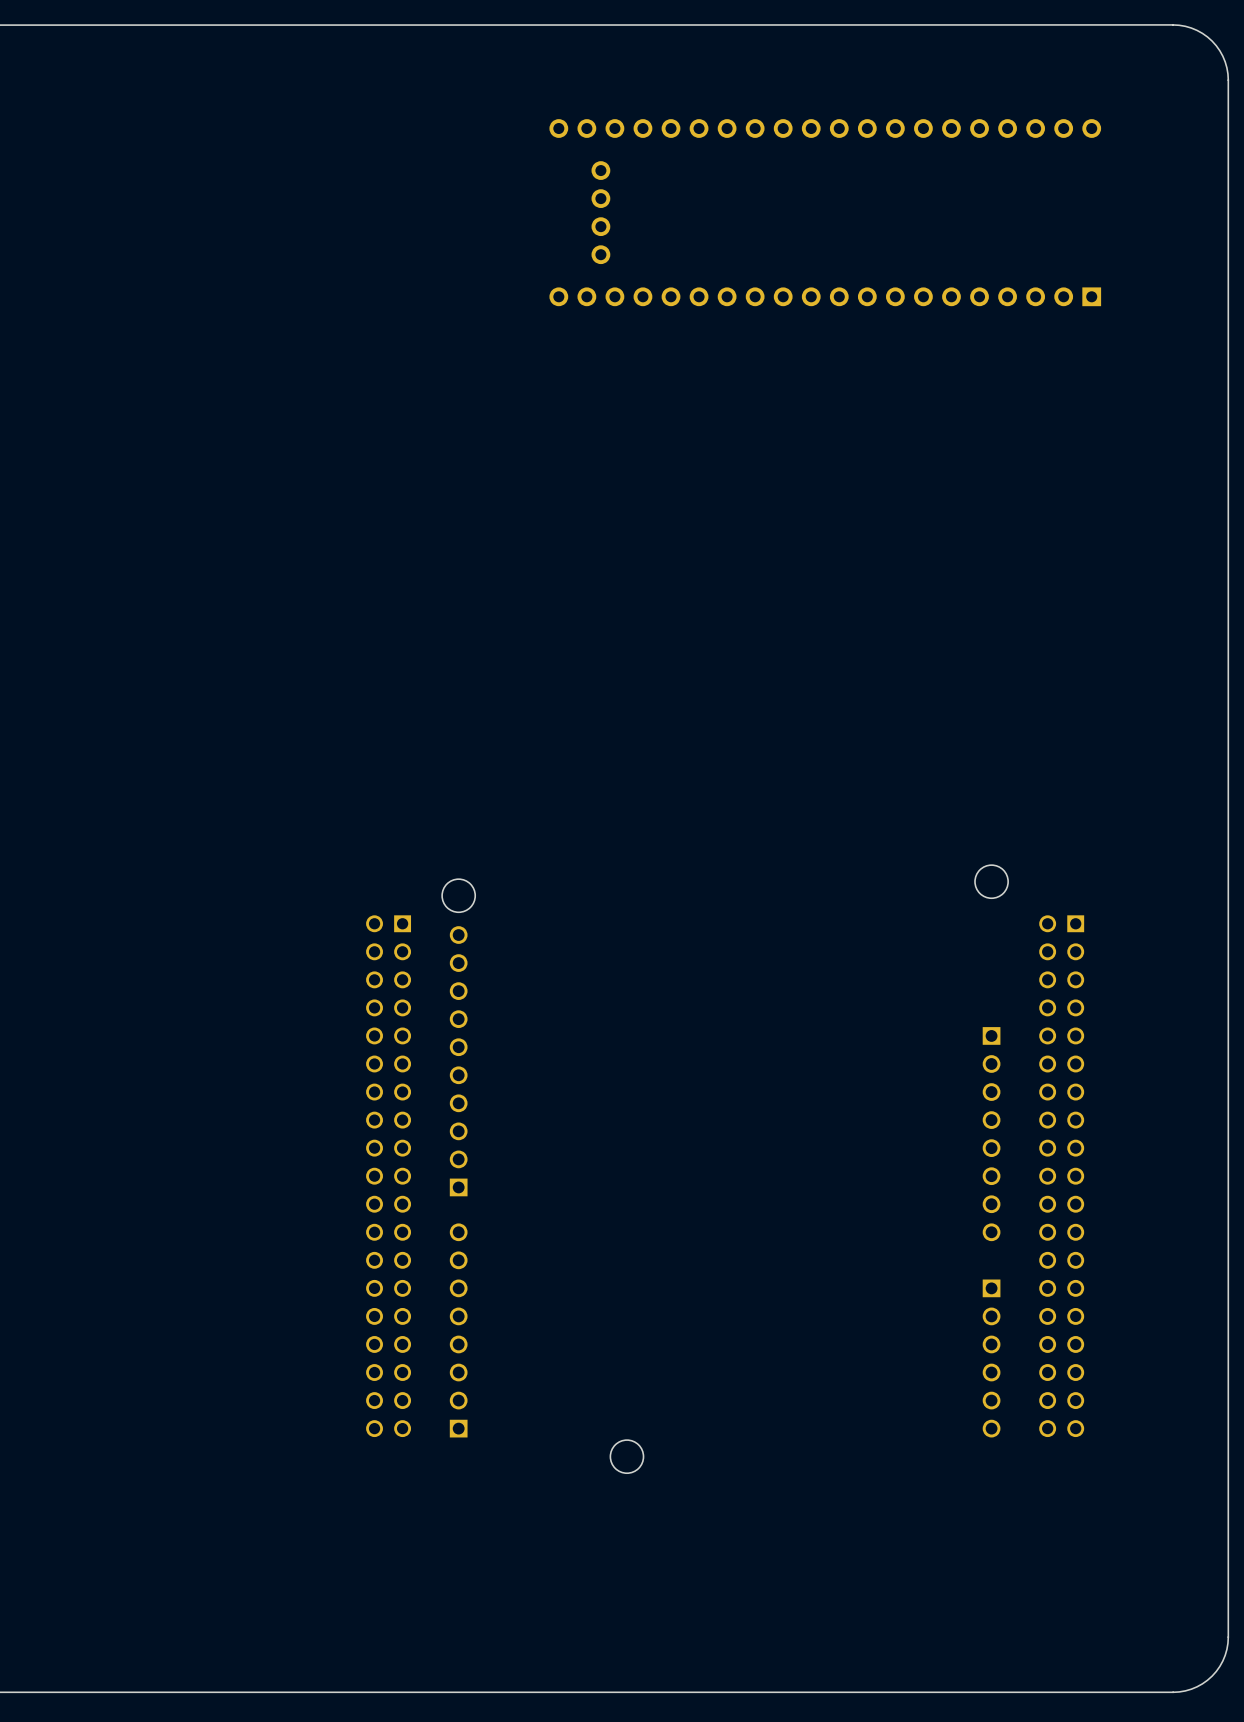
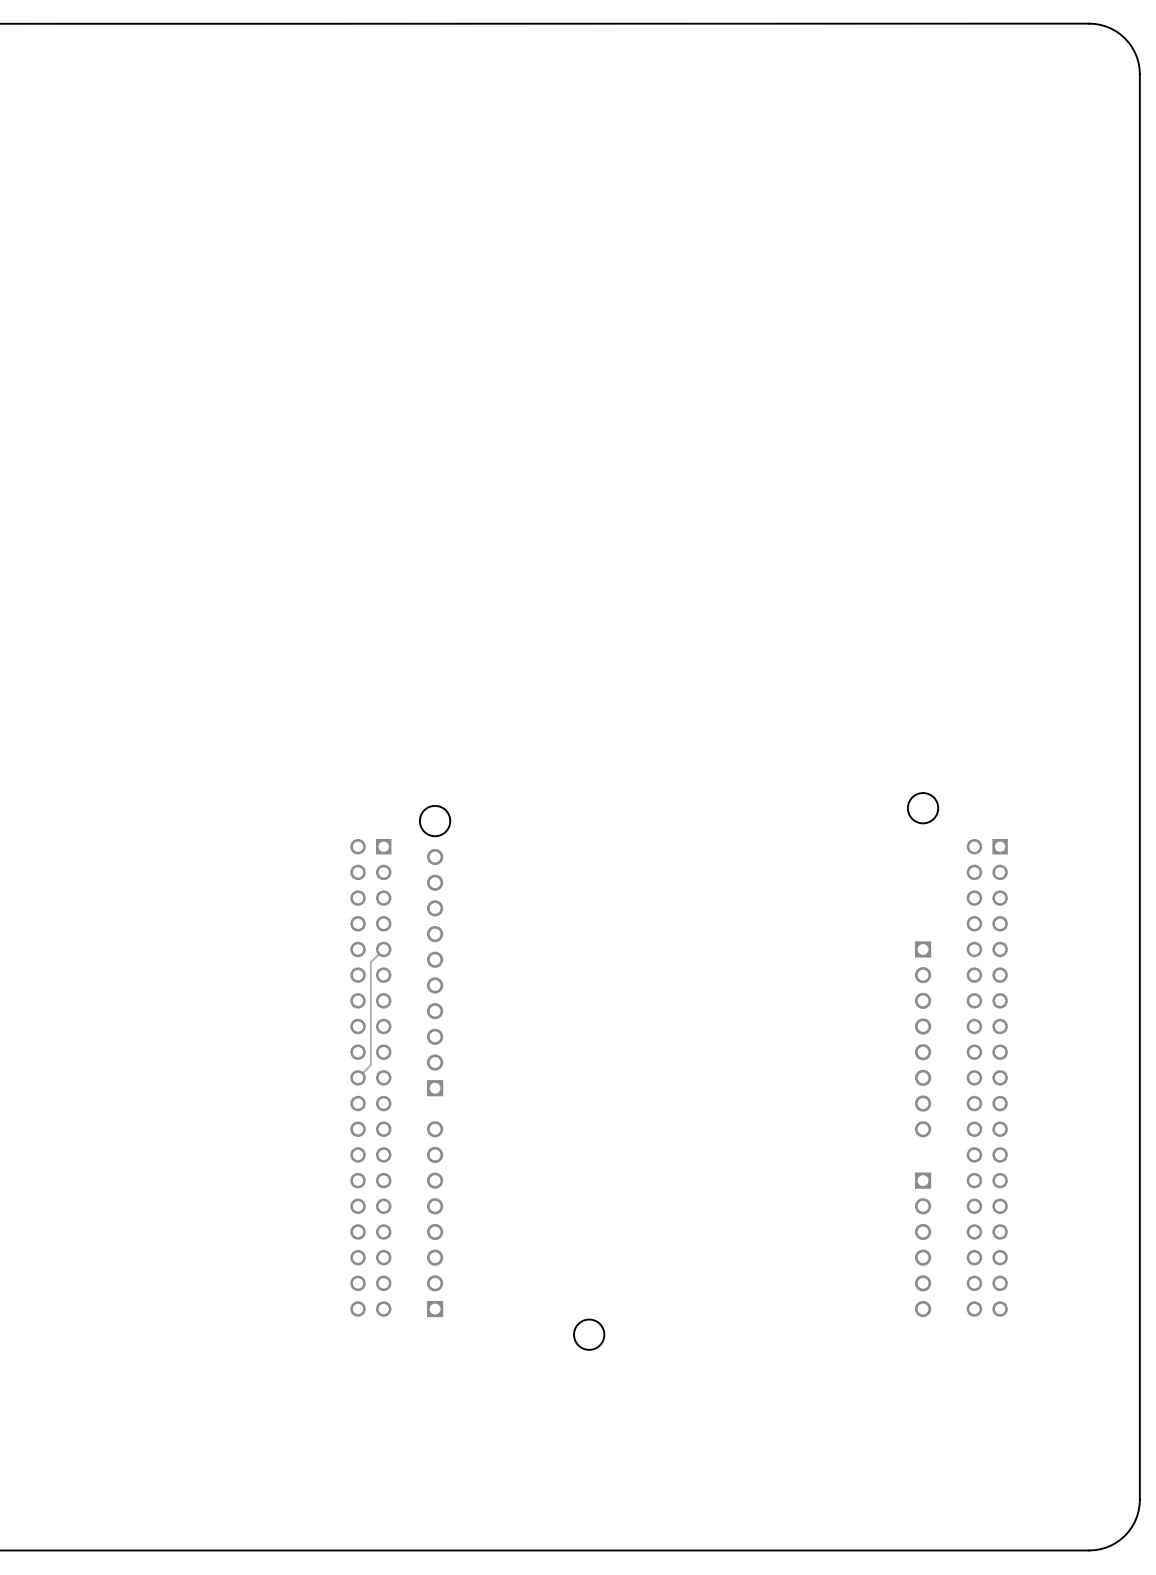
part: (825, 212) -> none
track: none -> (383, 949) (370, 962) (370, 1065) (358, 1077)

